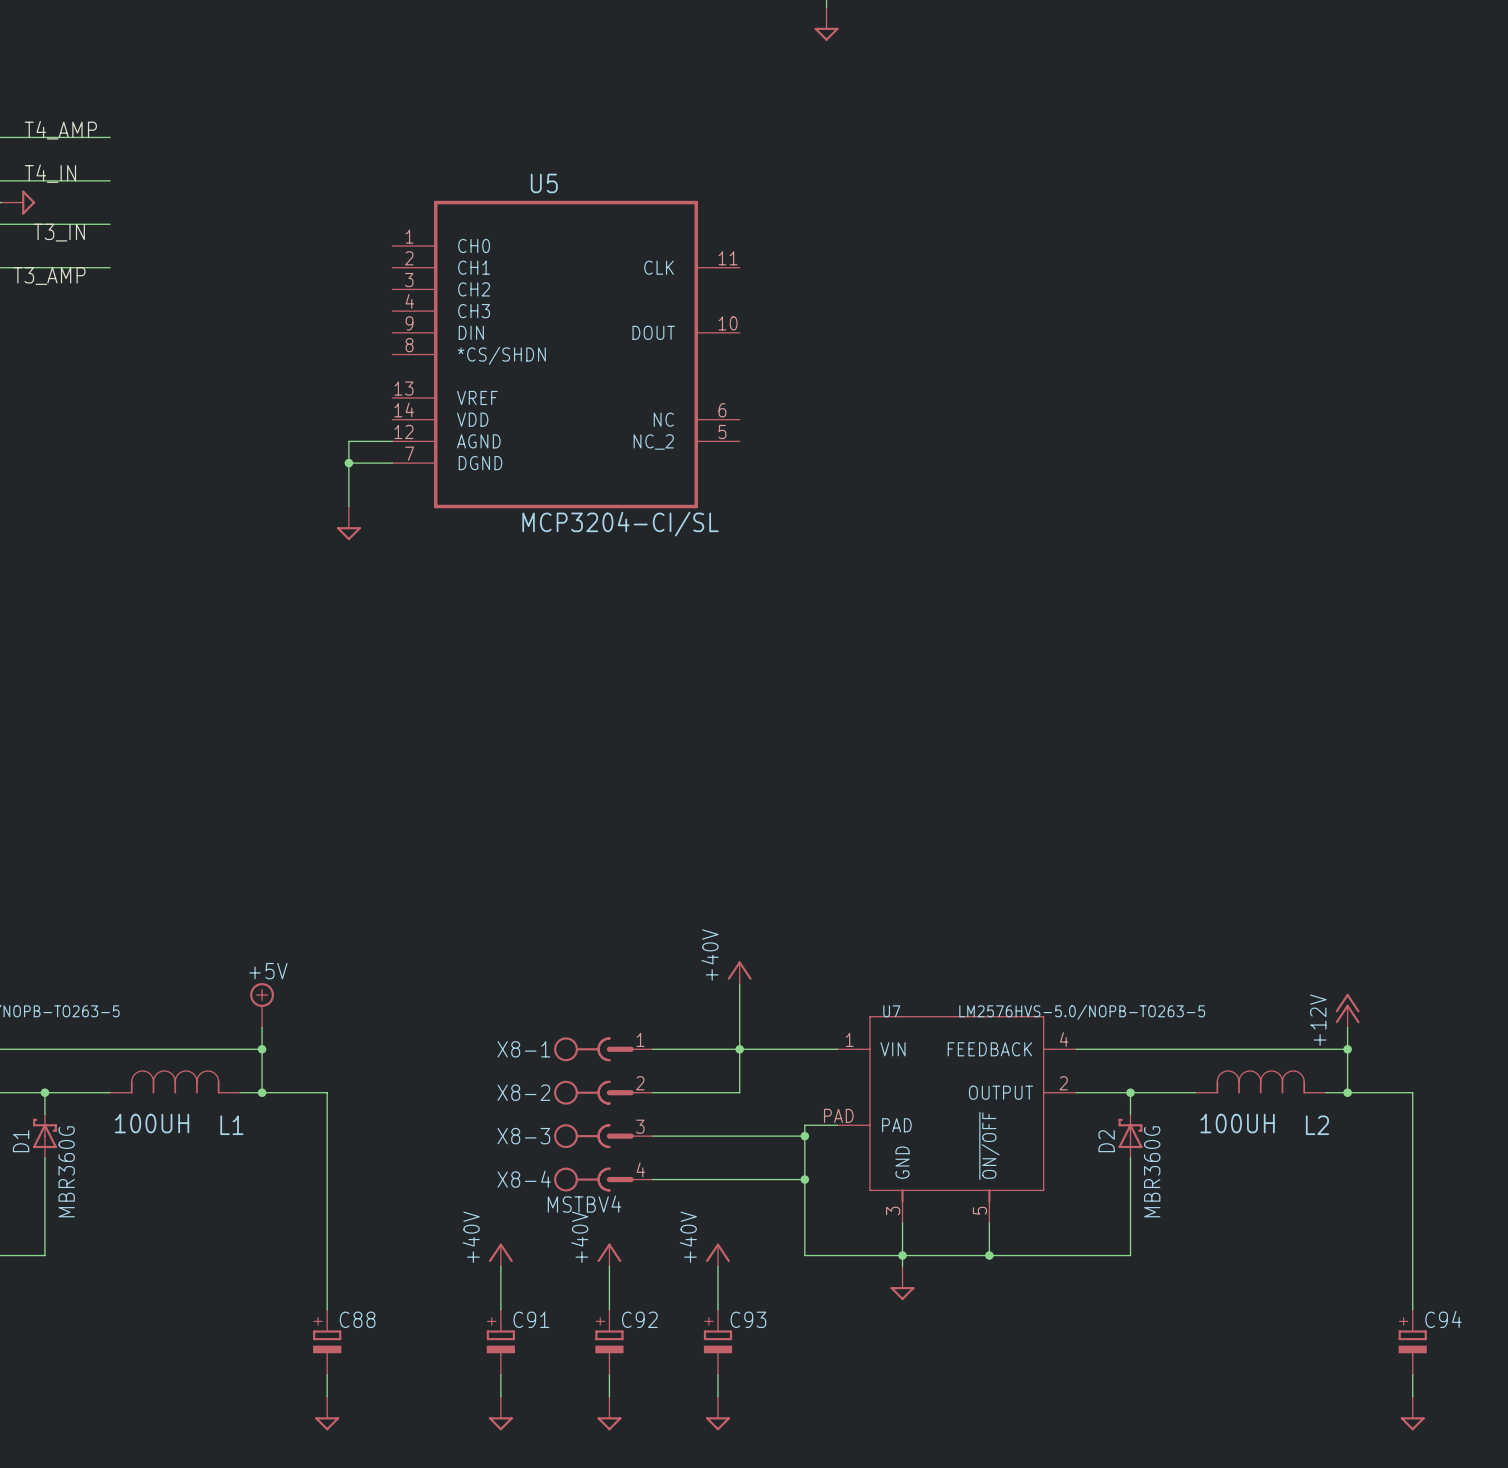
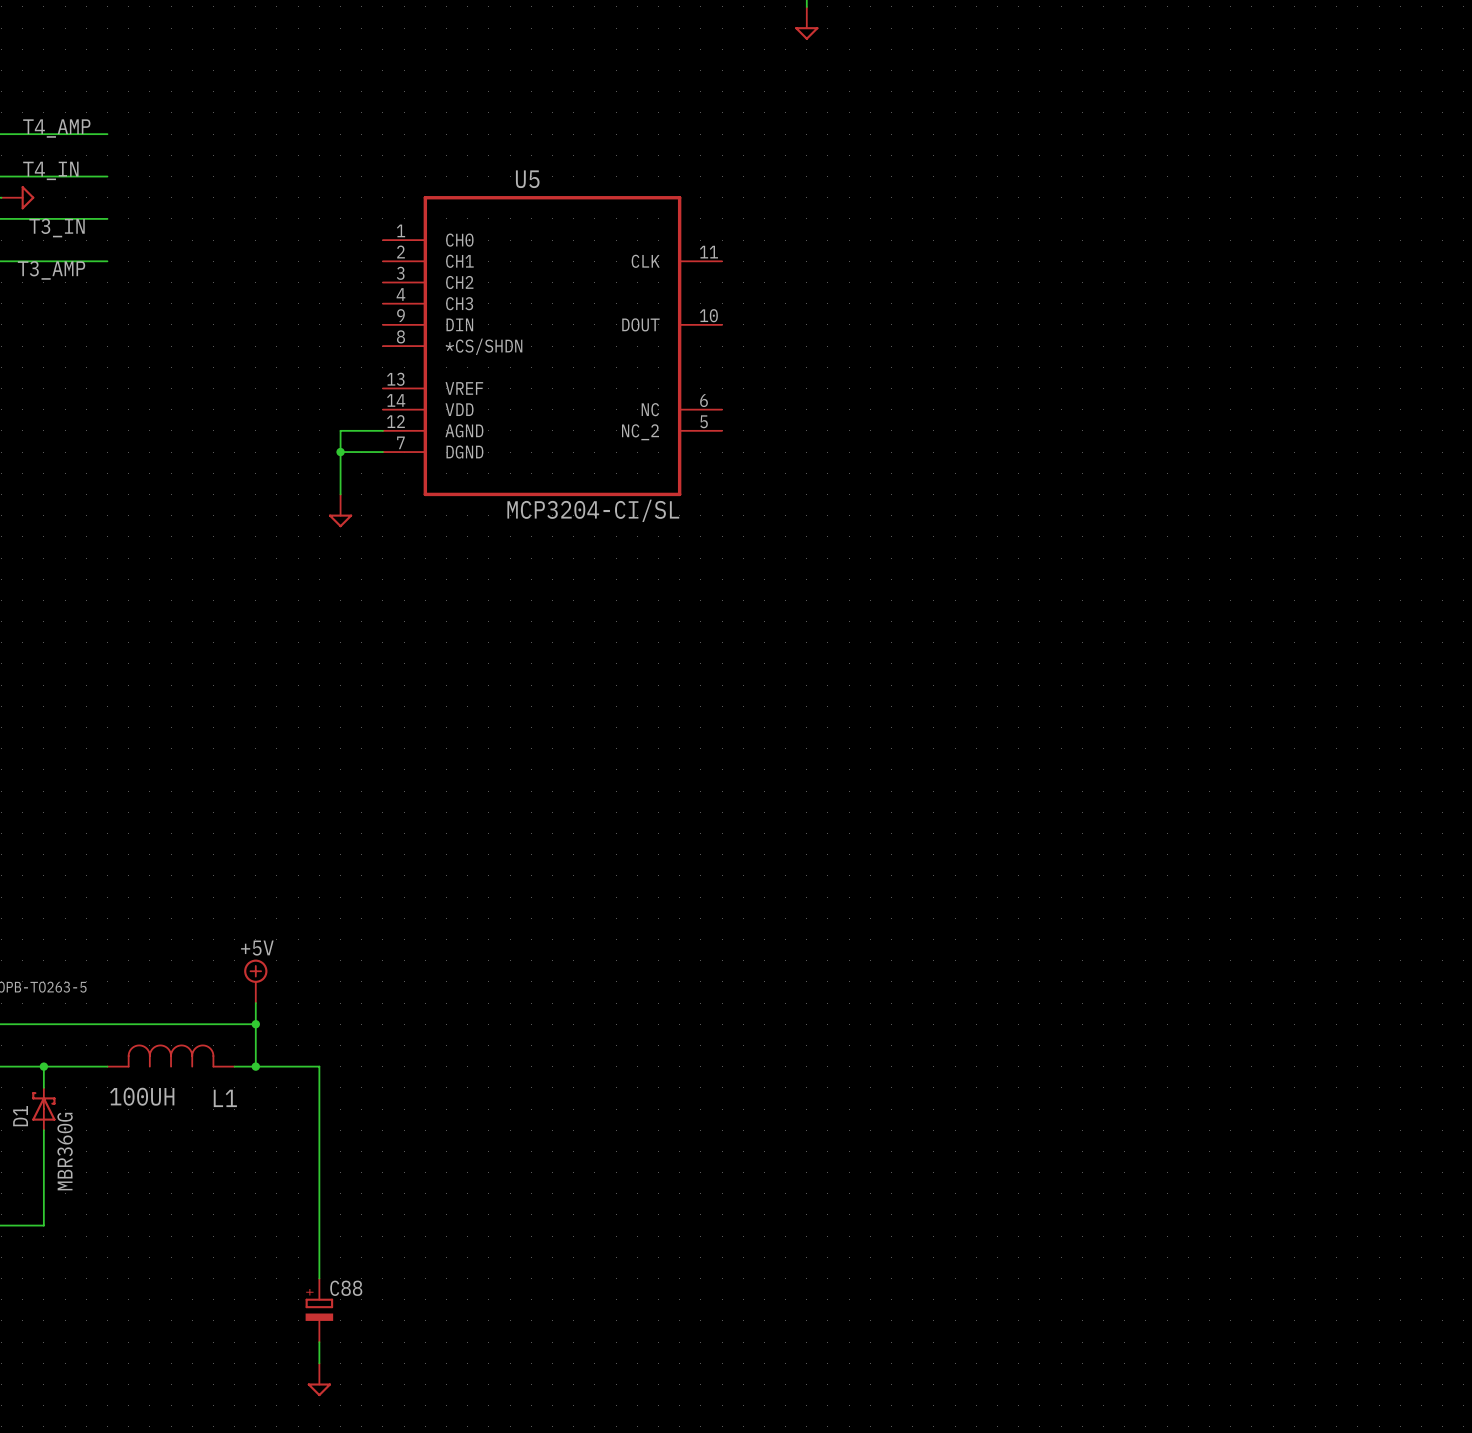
power symbol: +40V (739, 972) -> none
wire: (739, 984) (739, 1092) (652, 1092) -> none
power symbol: +12V (1347, 1010) -> none
wire: (1347, 1027) (1347, 1092) -> none
X8-1: (603, 1049) -> none
wire: (652, 1049) (837, 1049) -> none
junction: (739, 1049) -> none
wire: (1076, 1049) (1347, 1049) -> none
junction: (1347, 1049) -> none
L2: 100UH (1260, 1081) -> none
X8-2: (603, 1092) -> none
wire: (1076, 1092) (1195, 1092) -> none
wire: (1130, 1092) (1130, 1114) -> none
junction: (1130, 1092) -> none
wire: (1325, 1092) (1412, 1092) (1412, 1309) -> none
junction: (1347, 1092) -> none
U7: LM2576HVS-5.0/NOPB-TO263-5 (956, 1119) -> none
wire: (837, 1125) (804, 1125) (804, 1255) (1130, 1255) (1130, 1157) -> none
X8-3: (603, 1136) -> none
wire: (652, 1136) (804, 1136) -> none
junction: (804, 1136) -> none
D2: MBR360G (1130, 1136) -> none
X8-4: MSTBV4 (603, 1179) -> none
wire: (652, 1179) (804, 1179) -> none
junction: (804, 1179) -> none
wire: (902, 1222) (902, 1266) -> none
wire: (989, 1222) (989, 1255) -> none
power symbol: +40V (500, 1254) -> none
power symbol: +40V (609, 1254) -> none
power symbol: +40V (717, 1254) -> none
junction: (902, 1255) -> none
junction: (989, 1255) -> none
wire: (500, 1266) (500, 1309) -> none
wire: (609, 1266) (609, 1309) -> none
wire: (717, 1266) (717, 1309) -> none
power symbol: (902, 1283) -> none
C91: (500, 1342) -> none
C92: (609, 1342) -> none
C93: (717, 1342) -> none
C94: (1412, 1342) -> none
wire: (500, 1374) (500, 1396) -> none
wire: (609, 1374) (609, 1396) -> none
wire: (717, 1374) (717, 1396) -> none
wire: (1412, 1374) (1412, 1396) -> none
power symbol: (500, 1413) -> none
power symbol: (609, 1413) -> none
power symbol: (717, 1413) -> none
power symbol: (1412, 1413) -> none

